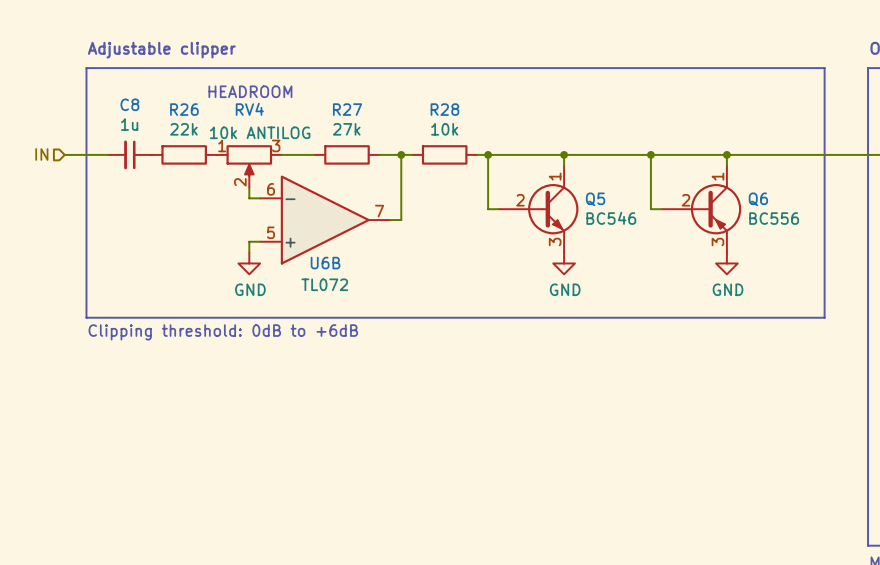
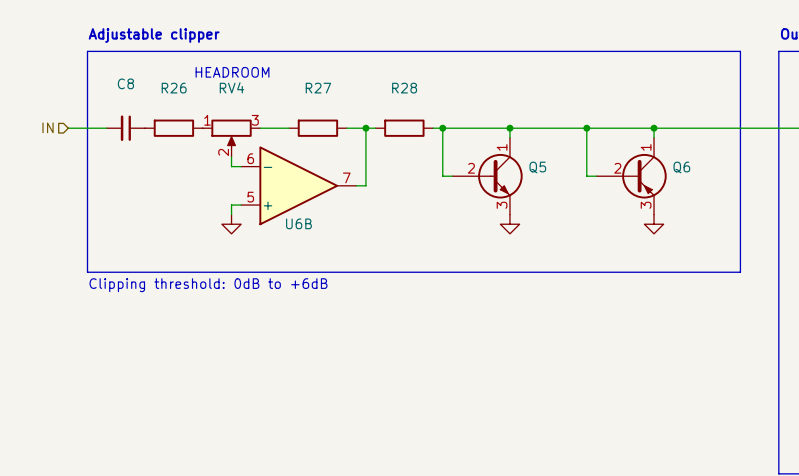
C8 value: 1u (129, 124) -> none
R26 value: 22k (183, 129) -> none
R27 value: 27k (346, 129) -> none
R28 value: 10k (444, 129) -> none
RV4 value: 10k ANTILOG (260, 132) -> none
Q5 value: BC546 (611, 218) -> none
Q6 value: BC556 (774, 218) -> none
U6B value: TL072 (324, 284) -> none
power symbol text: GND (250, 289) -> none
power symbol text: GND (565, 289) -> none
power symbol text: GND (728, 289) -> none

